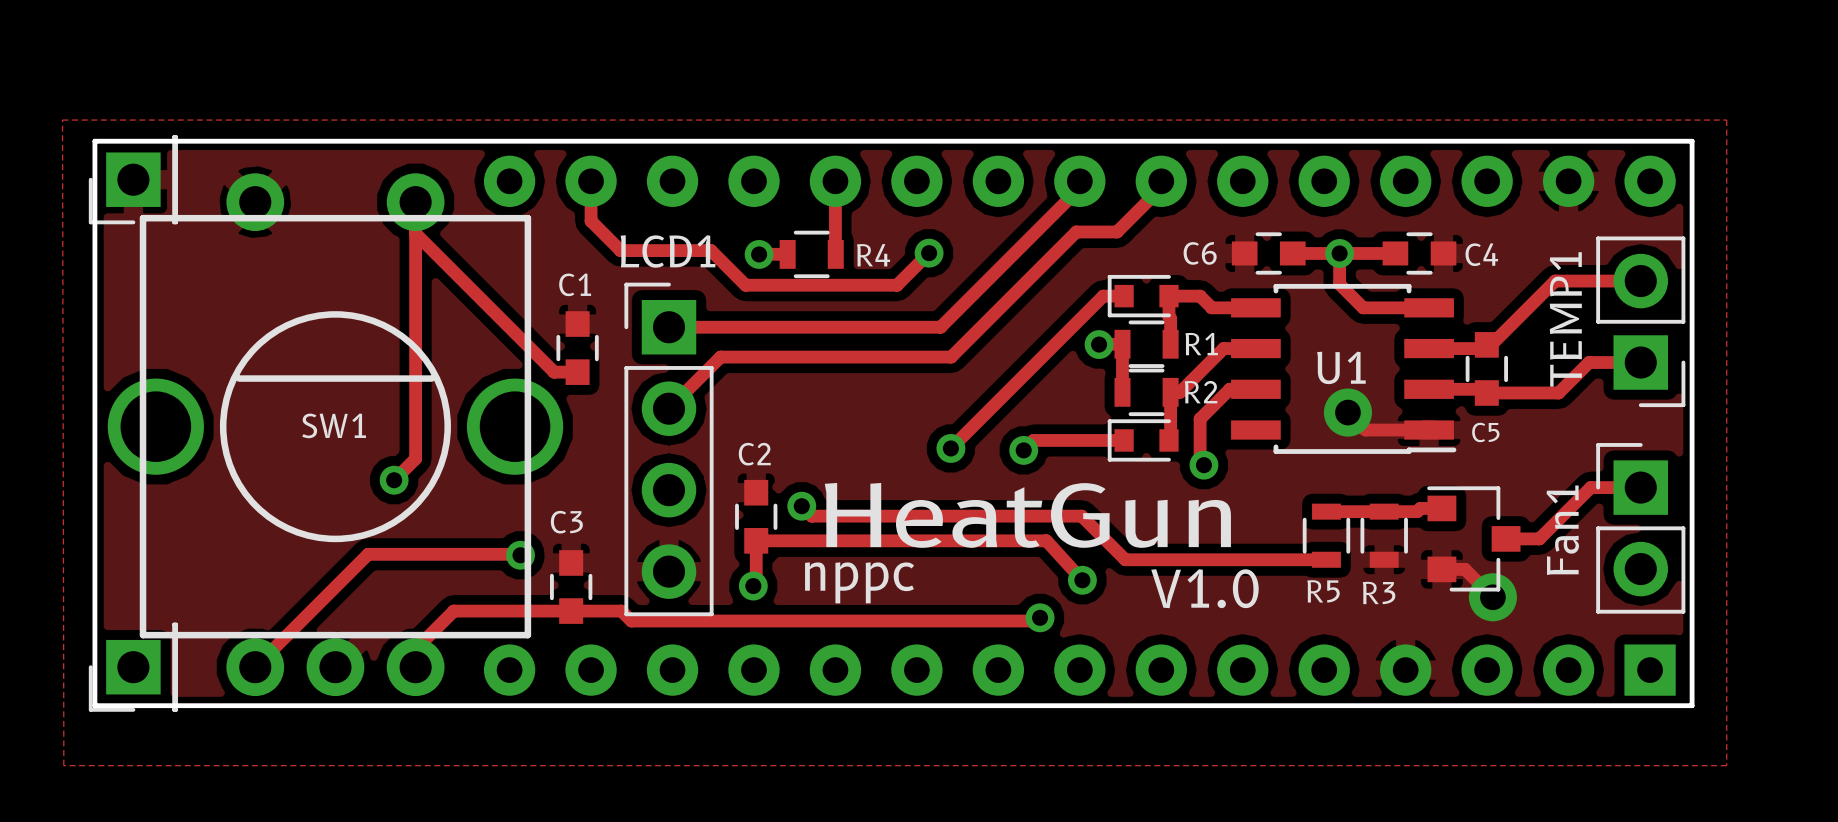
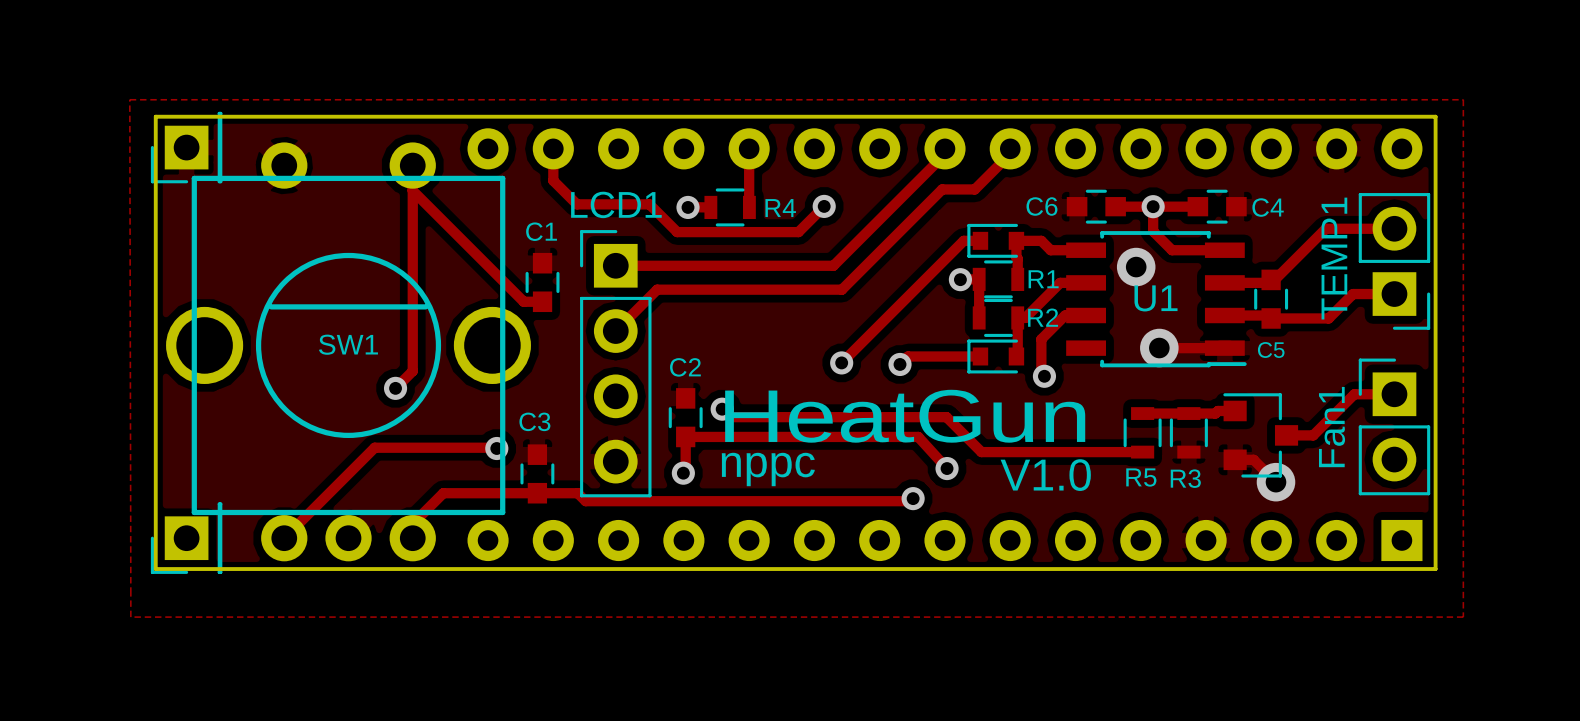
via: none -> (1136, 267)
via position: (1347, 412) -> (1159, 348)

